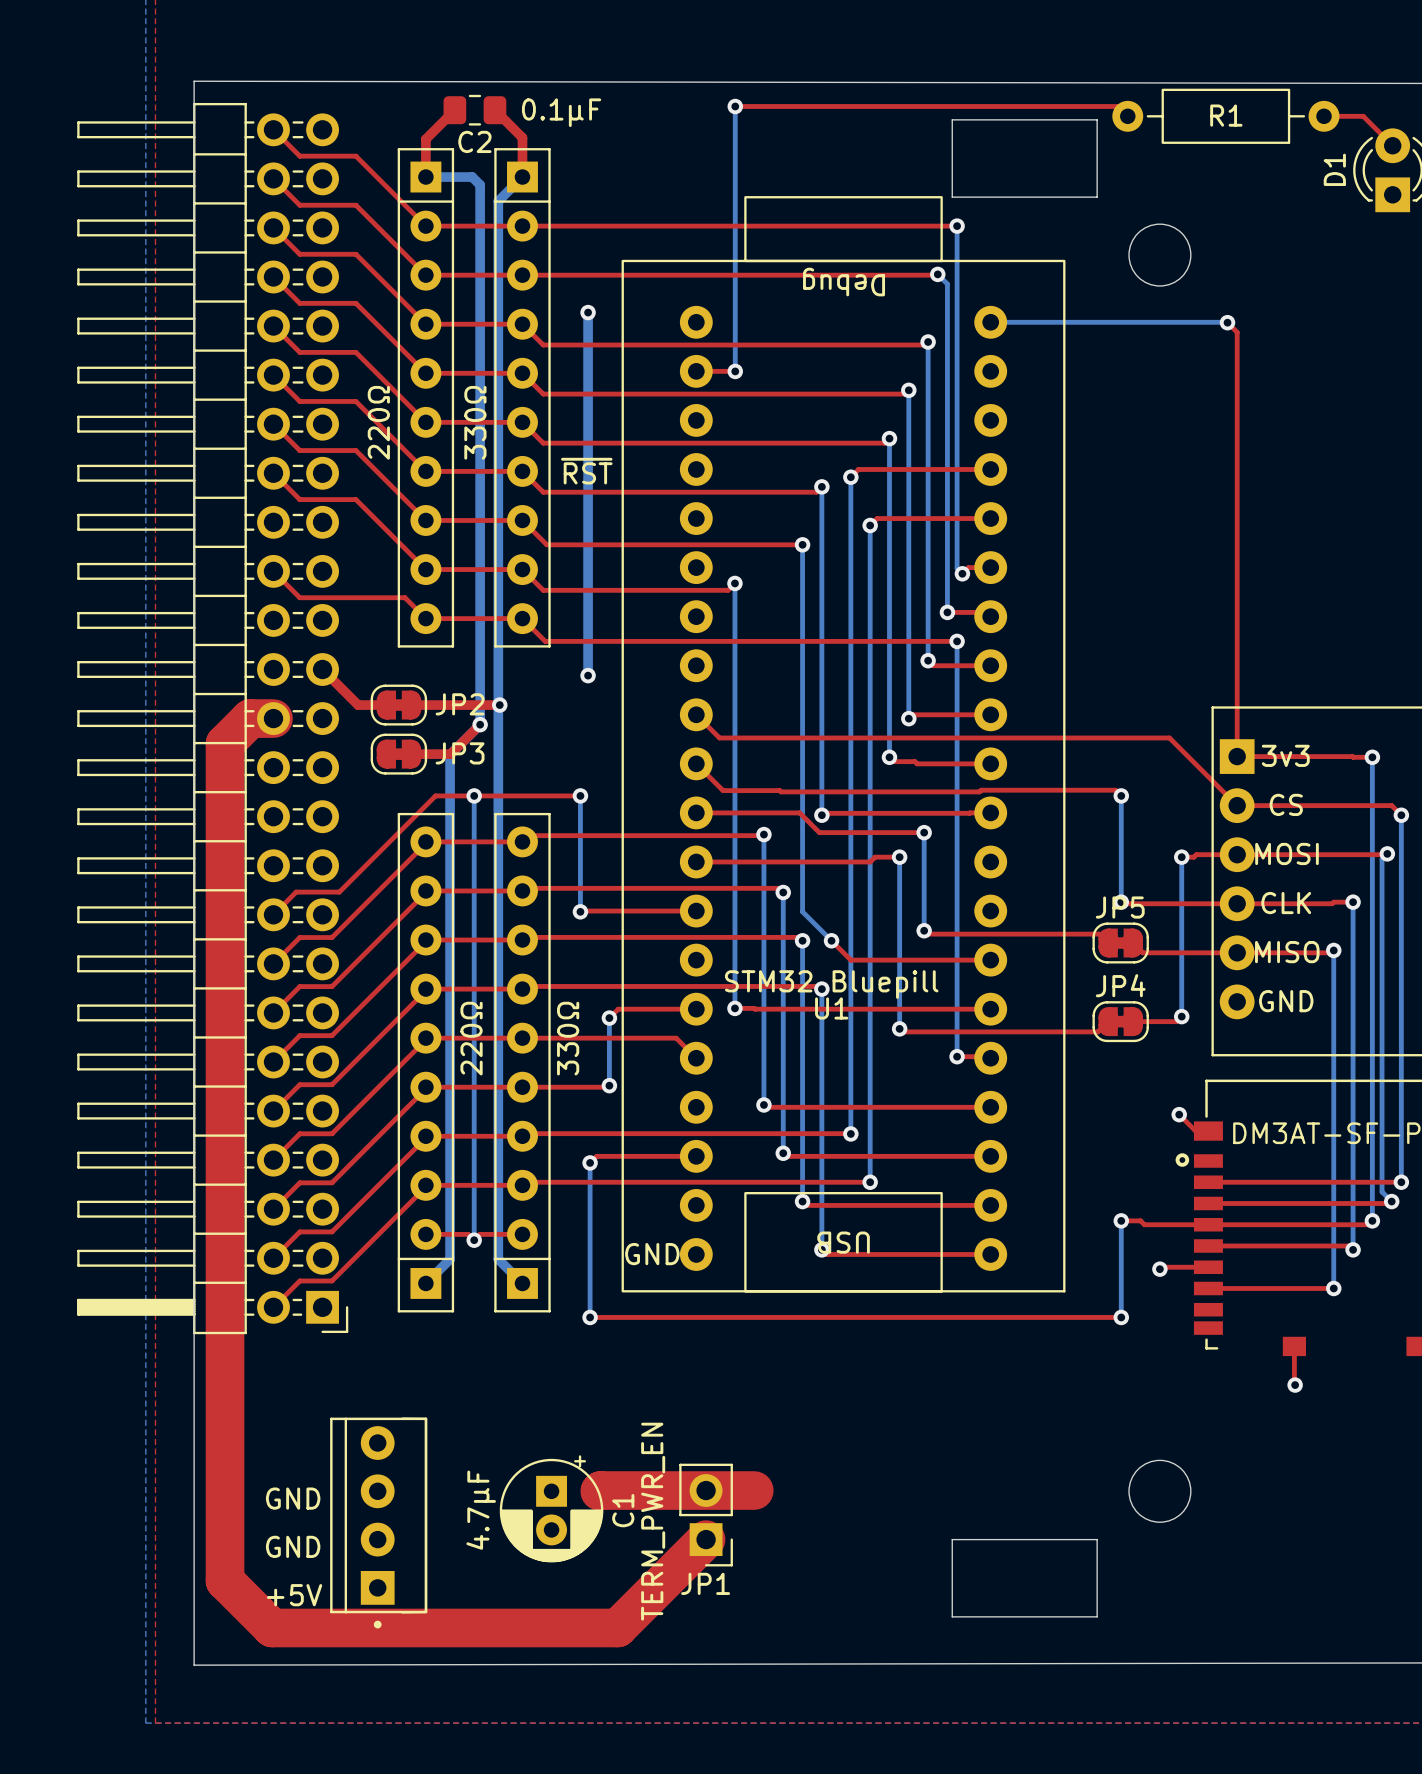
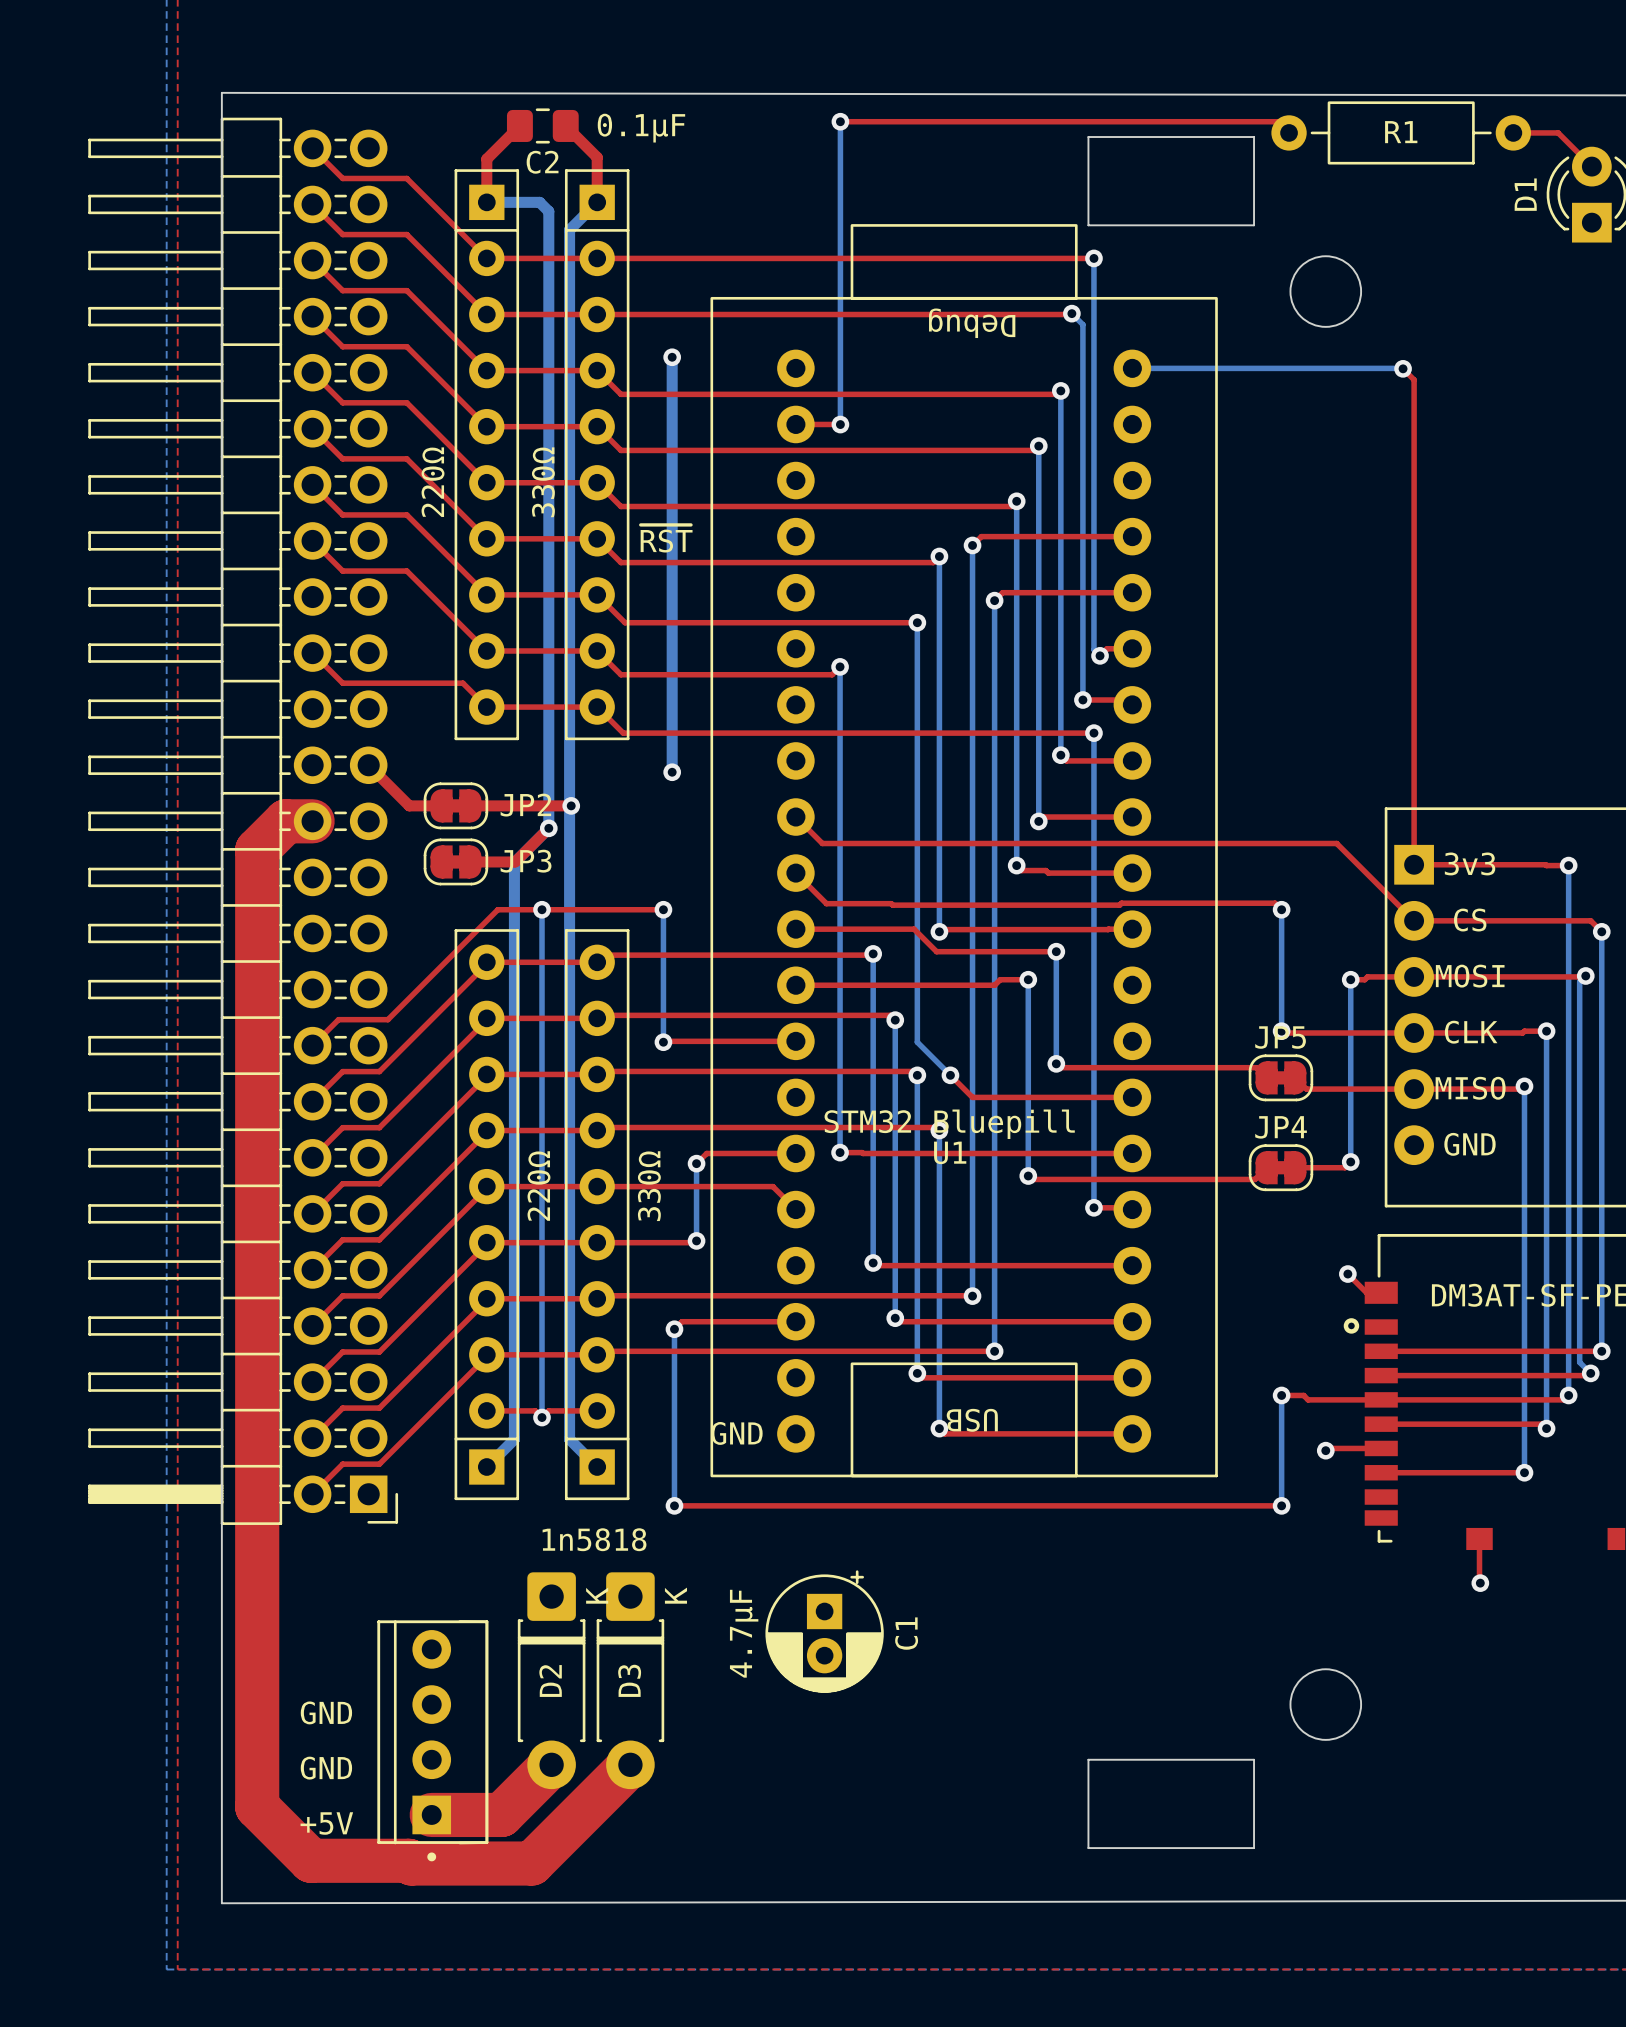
D2: none -> 1n5818 (551, 1680)
D3: none -> (630, 1680)
top track: (754, 1490) (599, 1491) -> none
C1 position: (551, 1508) -> (824, 1631)
JP1: TERM_PWR_EN (706, 1515) -> none
top track: (706, 1539) (617, 1627) (357, 1627) -> (630, 1764) (531, 1863) (411, 1863) (408, 1860)
top track: none -> (551, 1764) (501, 1814) (431, 1814)

